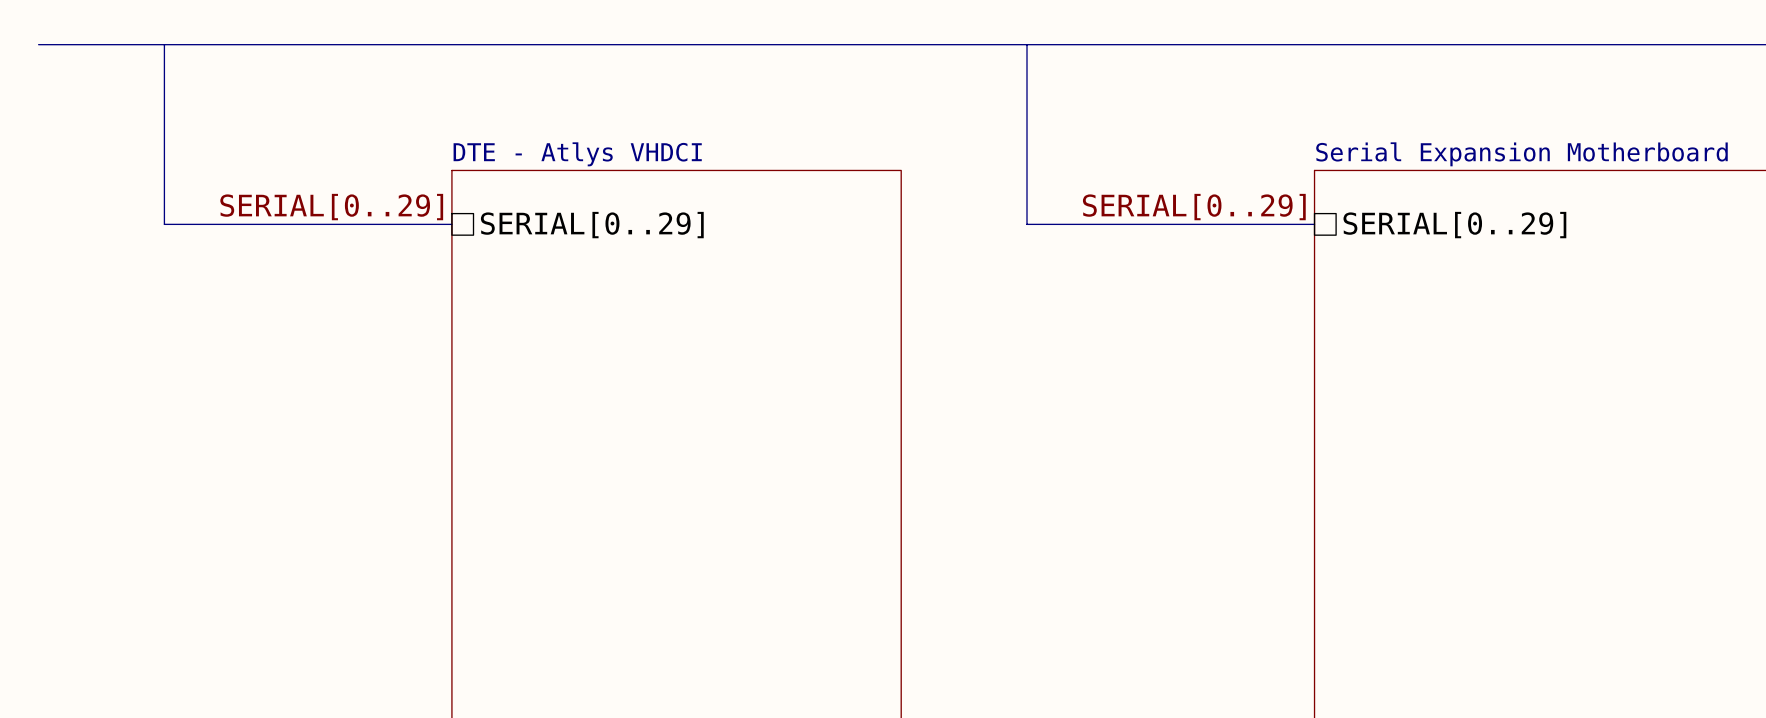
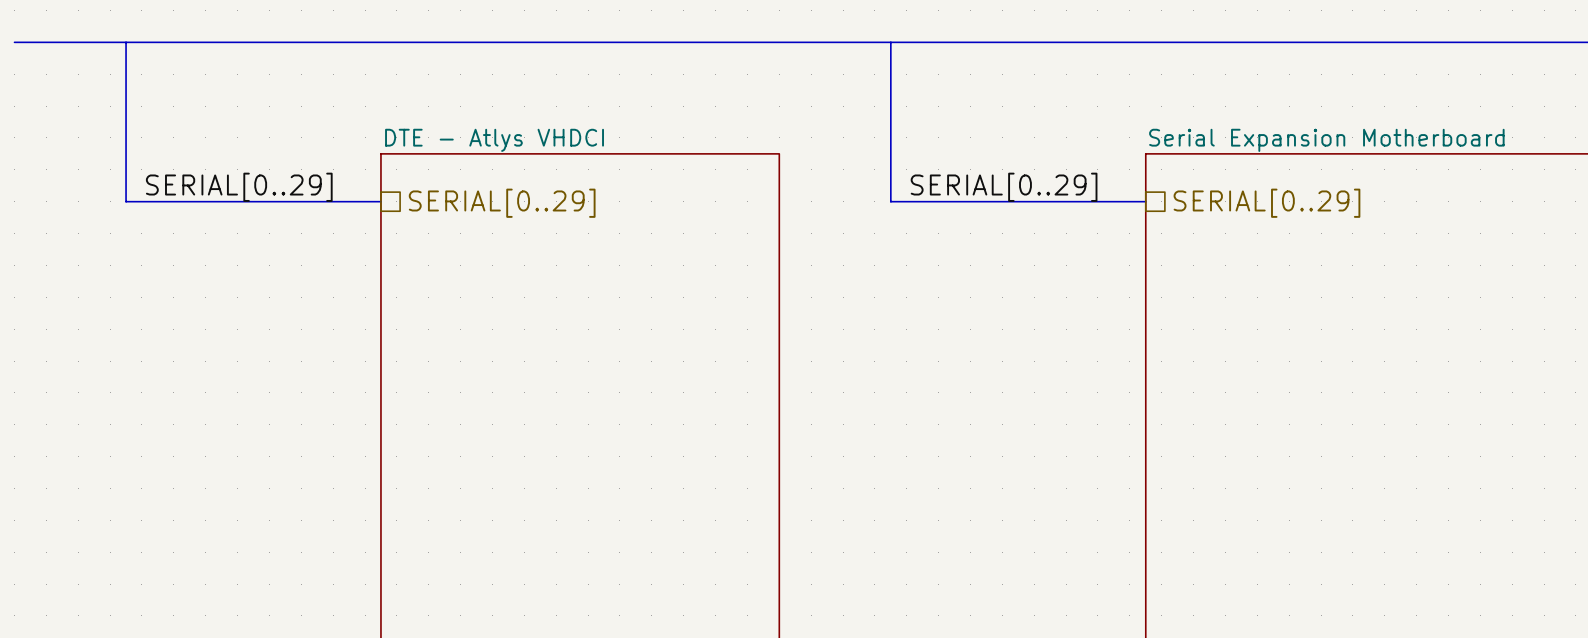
label position: SERIAL[0..29] (331, 207) -> SERIAL[0..29] (239, 187)
label position: SERIAL[0..29] (1194, 207) -> SERIAL[0..29] (1004, 187)
sheet pin: SERIAL[0..29] (592, 225) -> none
hierarchical label: none -> SERIAL[0..29] (502, 203)
sheet pin: SERIAL[0..29] (1454, 225) -> none
hierarchical label: none -> SERIAL[0..29] (1266, 203)

